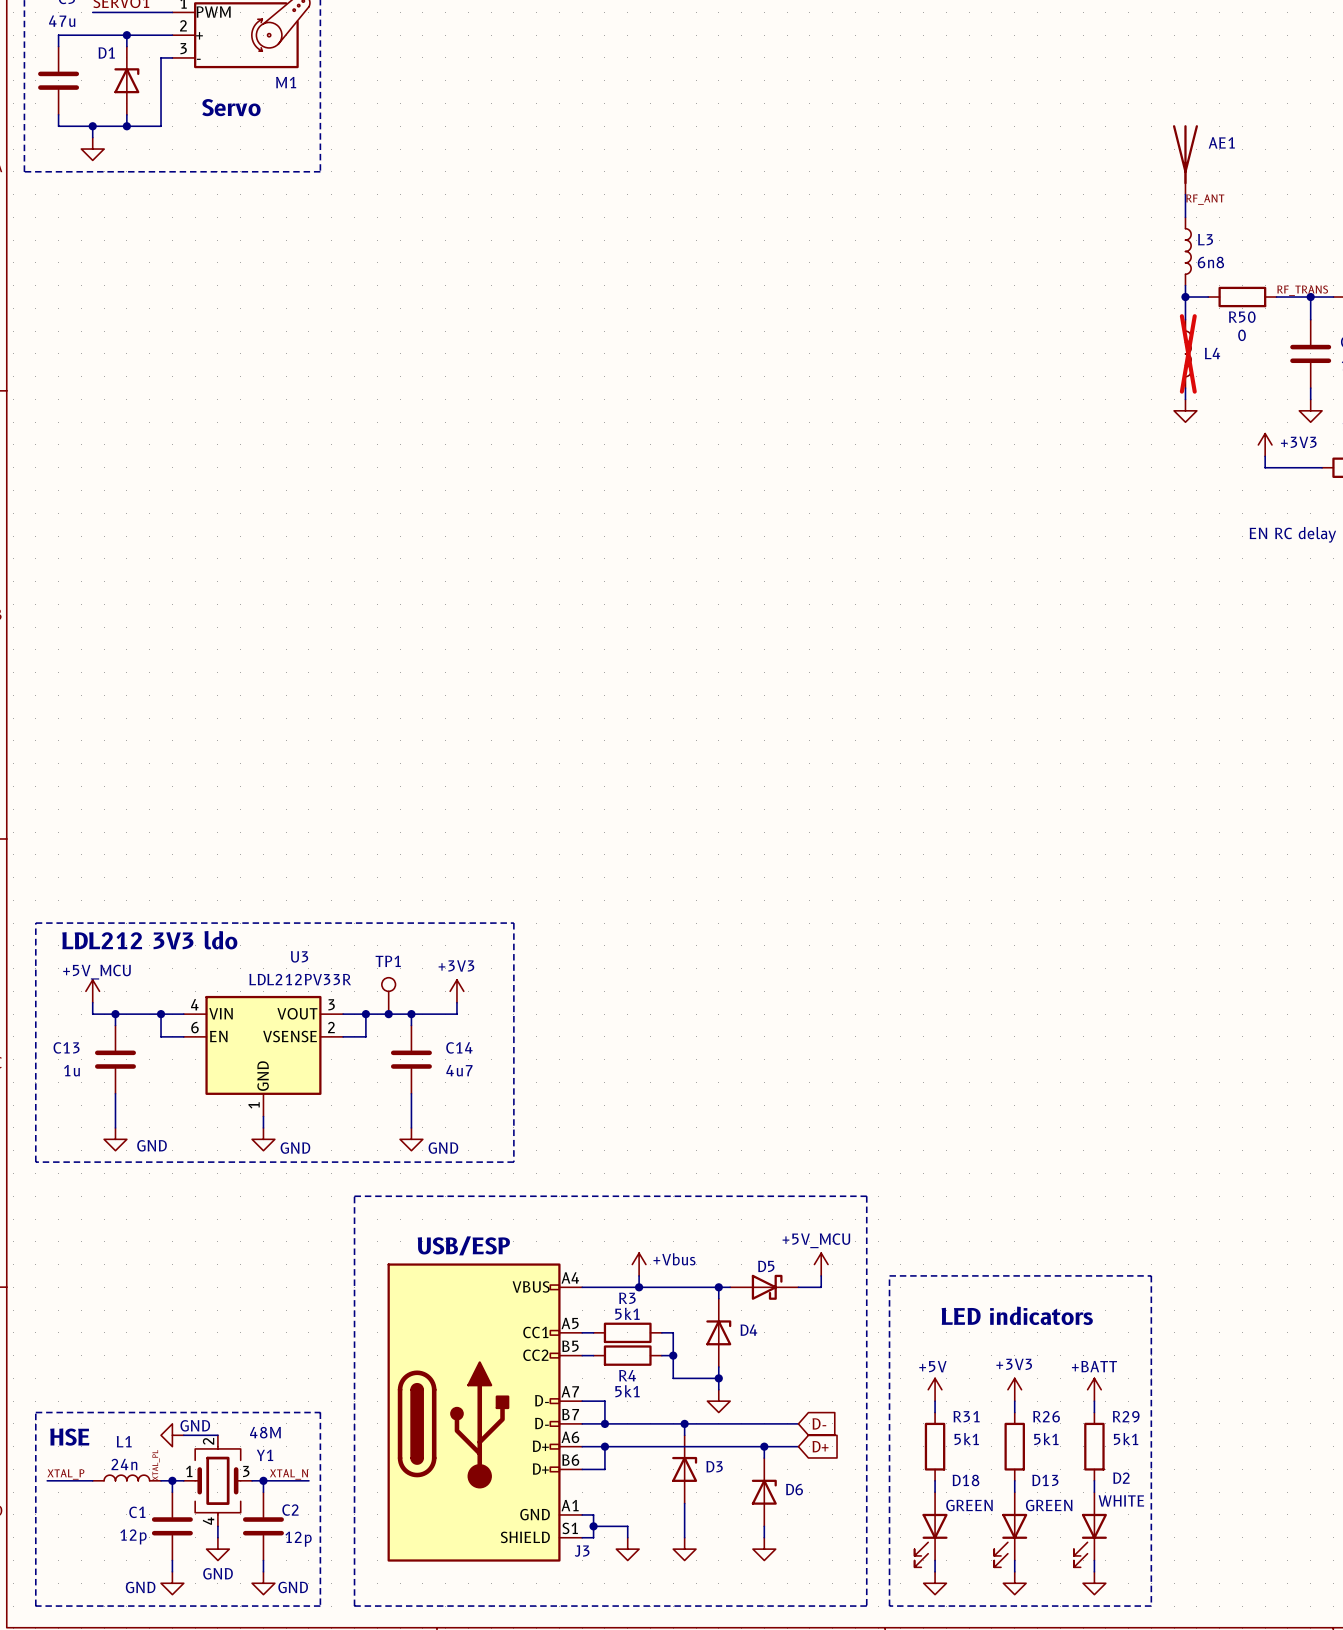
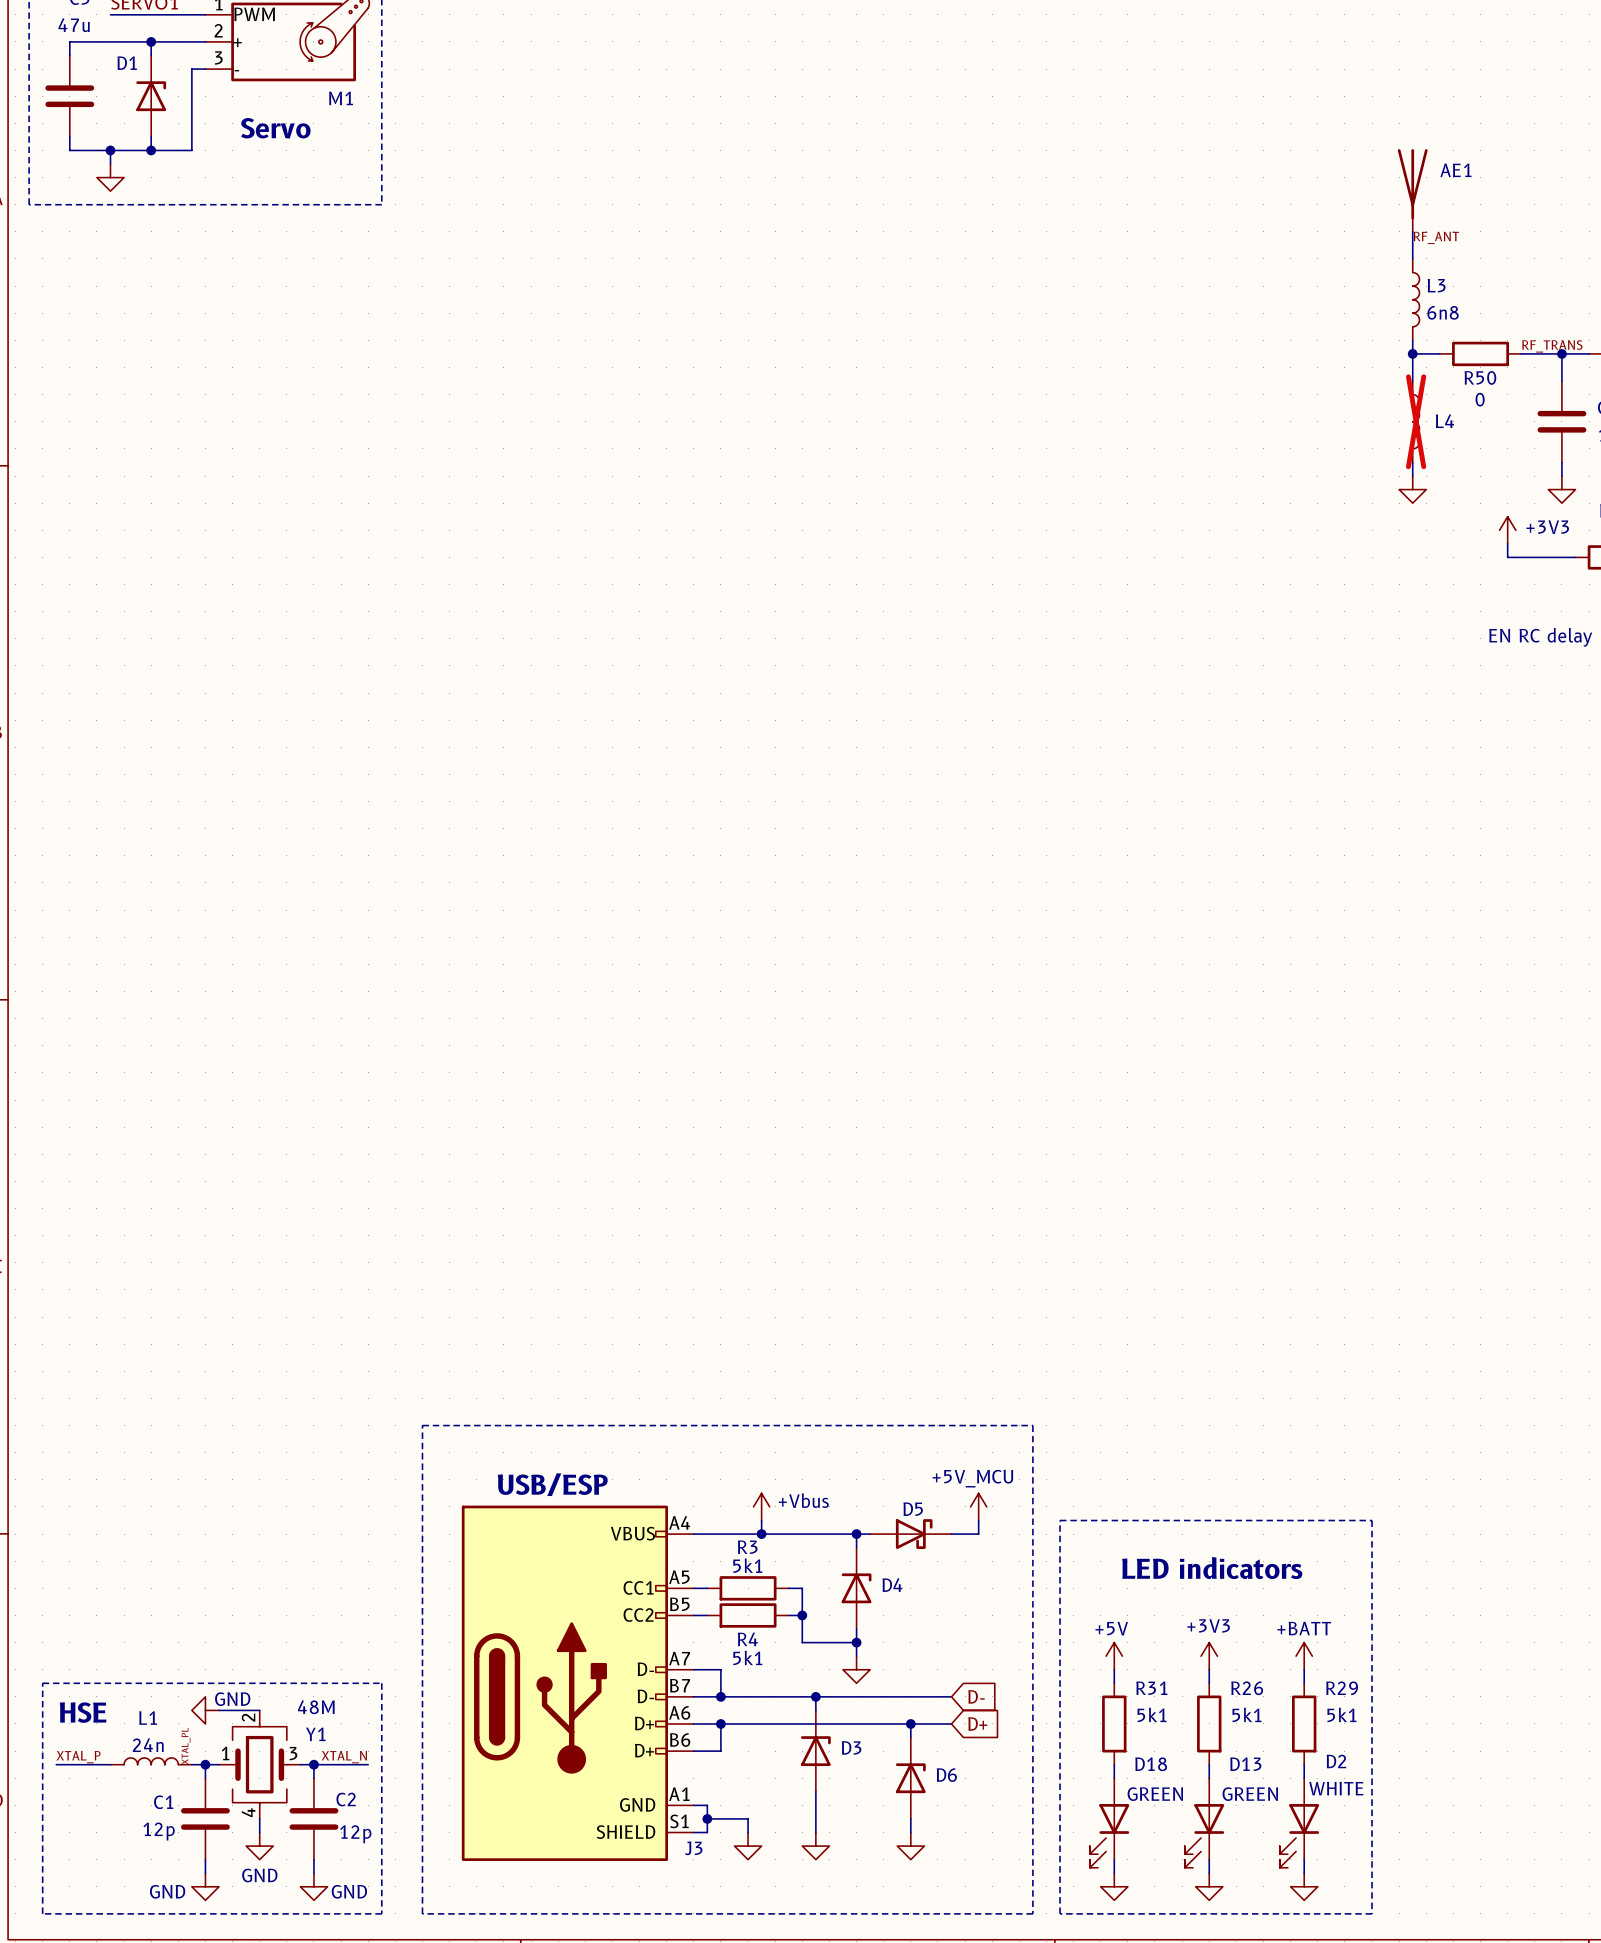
line: (35, 923) (513, 923) (513, 1162) (35, 1162) (35, 923) -> none
text: LDL212 3V3 ldo (149, 940) -> none
power symbol: +5V_MCU (92, 991) -> none
power symbol: +3V3 (456, 991) -> none
TP1: (388, 995) -> none
wire: (92, 1002) (92, 1014) (183, 1014) -> none
wire: (456, 1002) (456, 1014) (343, 1014) -> none
wire: (115, 1014) (115, 1025) -> none
junction: (115, 1014) -> none
wire: (161, 1014) (161, 1036) (183, 1036) -> none
junction: (161, 1014) -> none
wire: (365, 1014) (365, 1036) (343, 1036) -> none
junction: (365, 1014) -> none
junction: (388, 1014) -> none
wire: (411, 1014) (411, 1025) -> none
junction: (411, 1014) -> none
U3: LDL212PV33R (263, 1056) -> none
C13: 1u (115, 1059) -> none
C14: 4u7 (411, 1059) -> none
wire: (115, 1093) (115, 1127) -> none
wire: (411, 1093) (411, 1127) -> none
wire: (263, 1116) (263, 1127) -> none
power symbol: GND (115, 1139) -> none
power symbol: GND (263, 1139) -> none
power symbol: GND (411, 1139) -> none

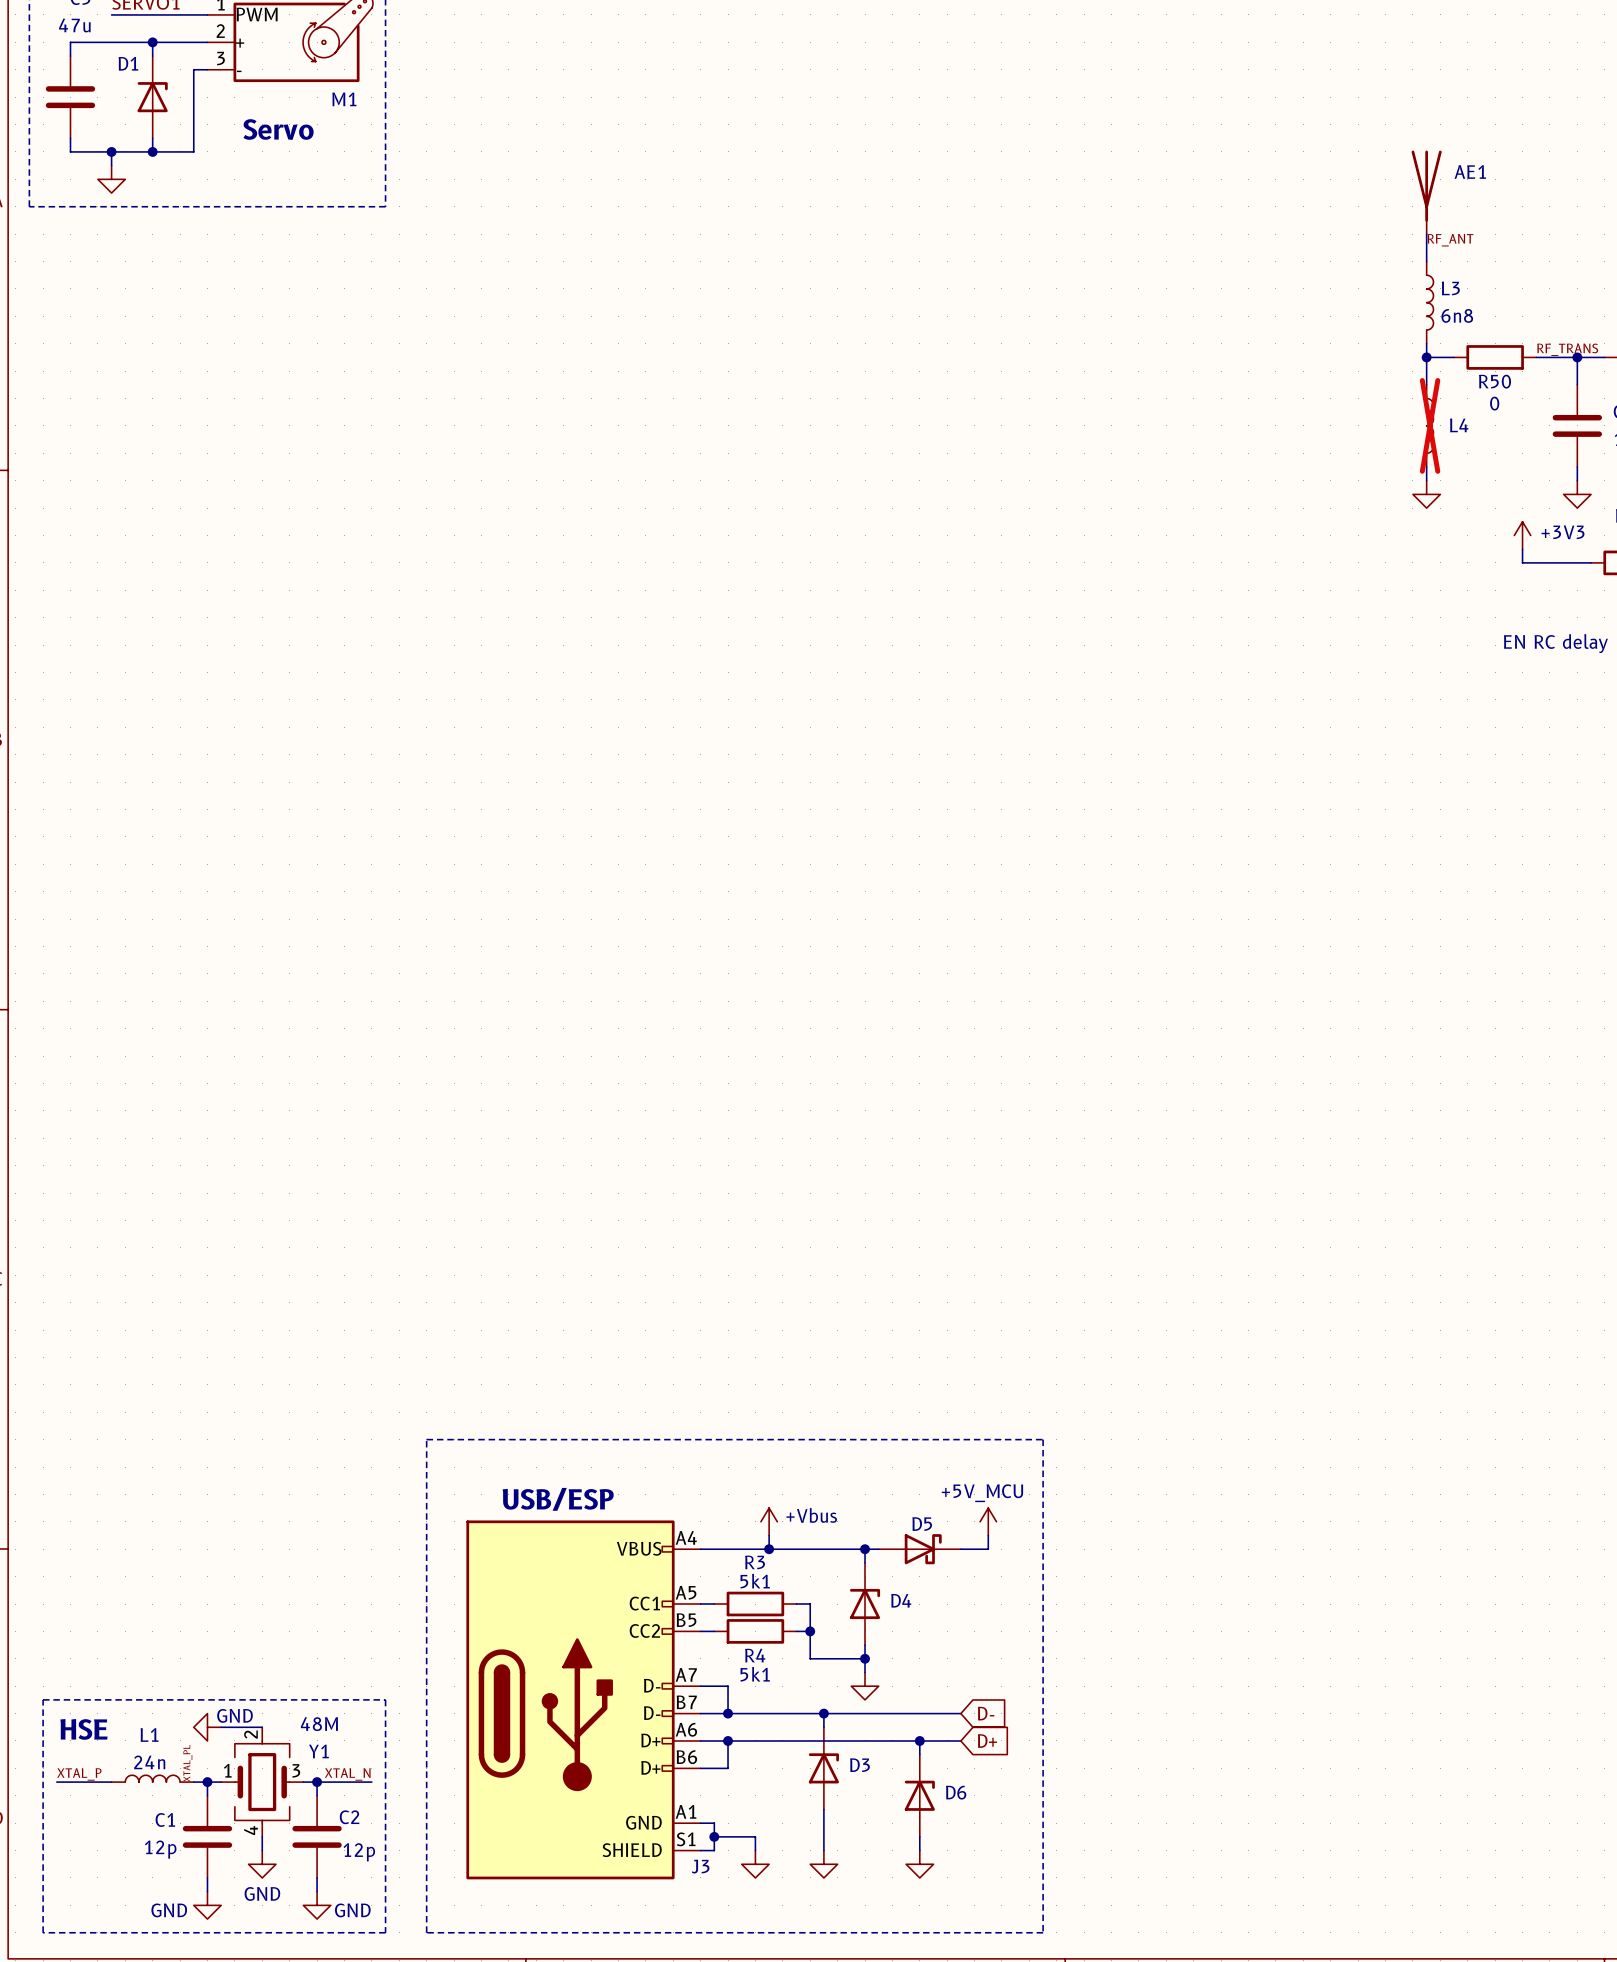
line: (1060, 1520) (1372, 1520) (1372, 1913) (1060, 1913) (1060, 1520) -> none
text: LED indicators (1212, 1568) -> none
power symbol: +5V (1114, 1656) -> none
power symbol: +3V3 (1209, 1656) -> none
power symbol: +BATT (1304, 1656) -> none
wire: (1114, 1669) (1114, 1683) -> none
wire: (1209, 1669) (1209, 1683) -> none
wire: (1304, 1669) (1304, 1683) -> none
R31: 5k1 (1114, 1723) -> none
R26: 5k1 (1209, 1723) -> none
R29: 5k1 (1304, 1723) -> none
wire: (1114, 1764) (1114, 1778) -> none
wire: (1209, 1764) (1209, 1778) -> none
wire: (1304, 1764) (1304, 1778) -> none
D18: GREEN (1109, 1823) -> none
D13: GREEN (1204, 1823) -> none
D2: WHITE (1299, 1823) -> none
wire: (1114, 1859) (1114, 1873) -> none
wire: (1209, 1859) (1209, 1873) -> none
wire: (1304, 1859) (1304, 1873) -> none
power symbol: (1114, 1886) -> none
power symbol: (1209, 1886) -> none
power symbol: (1304, 1886) -> none

